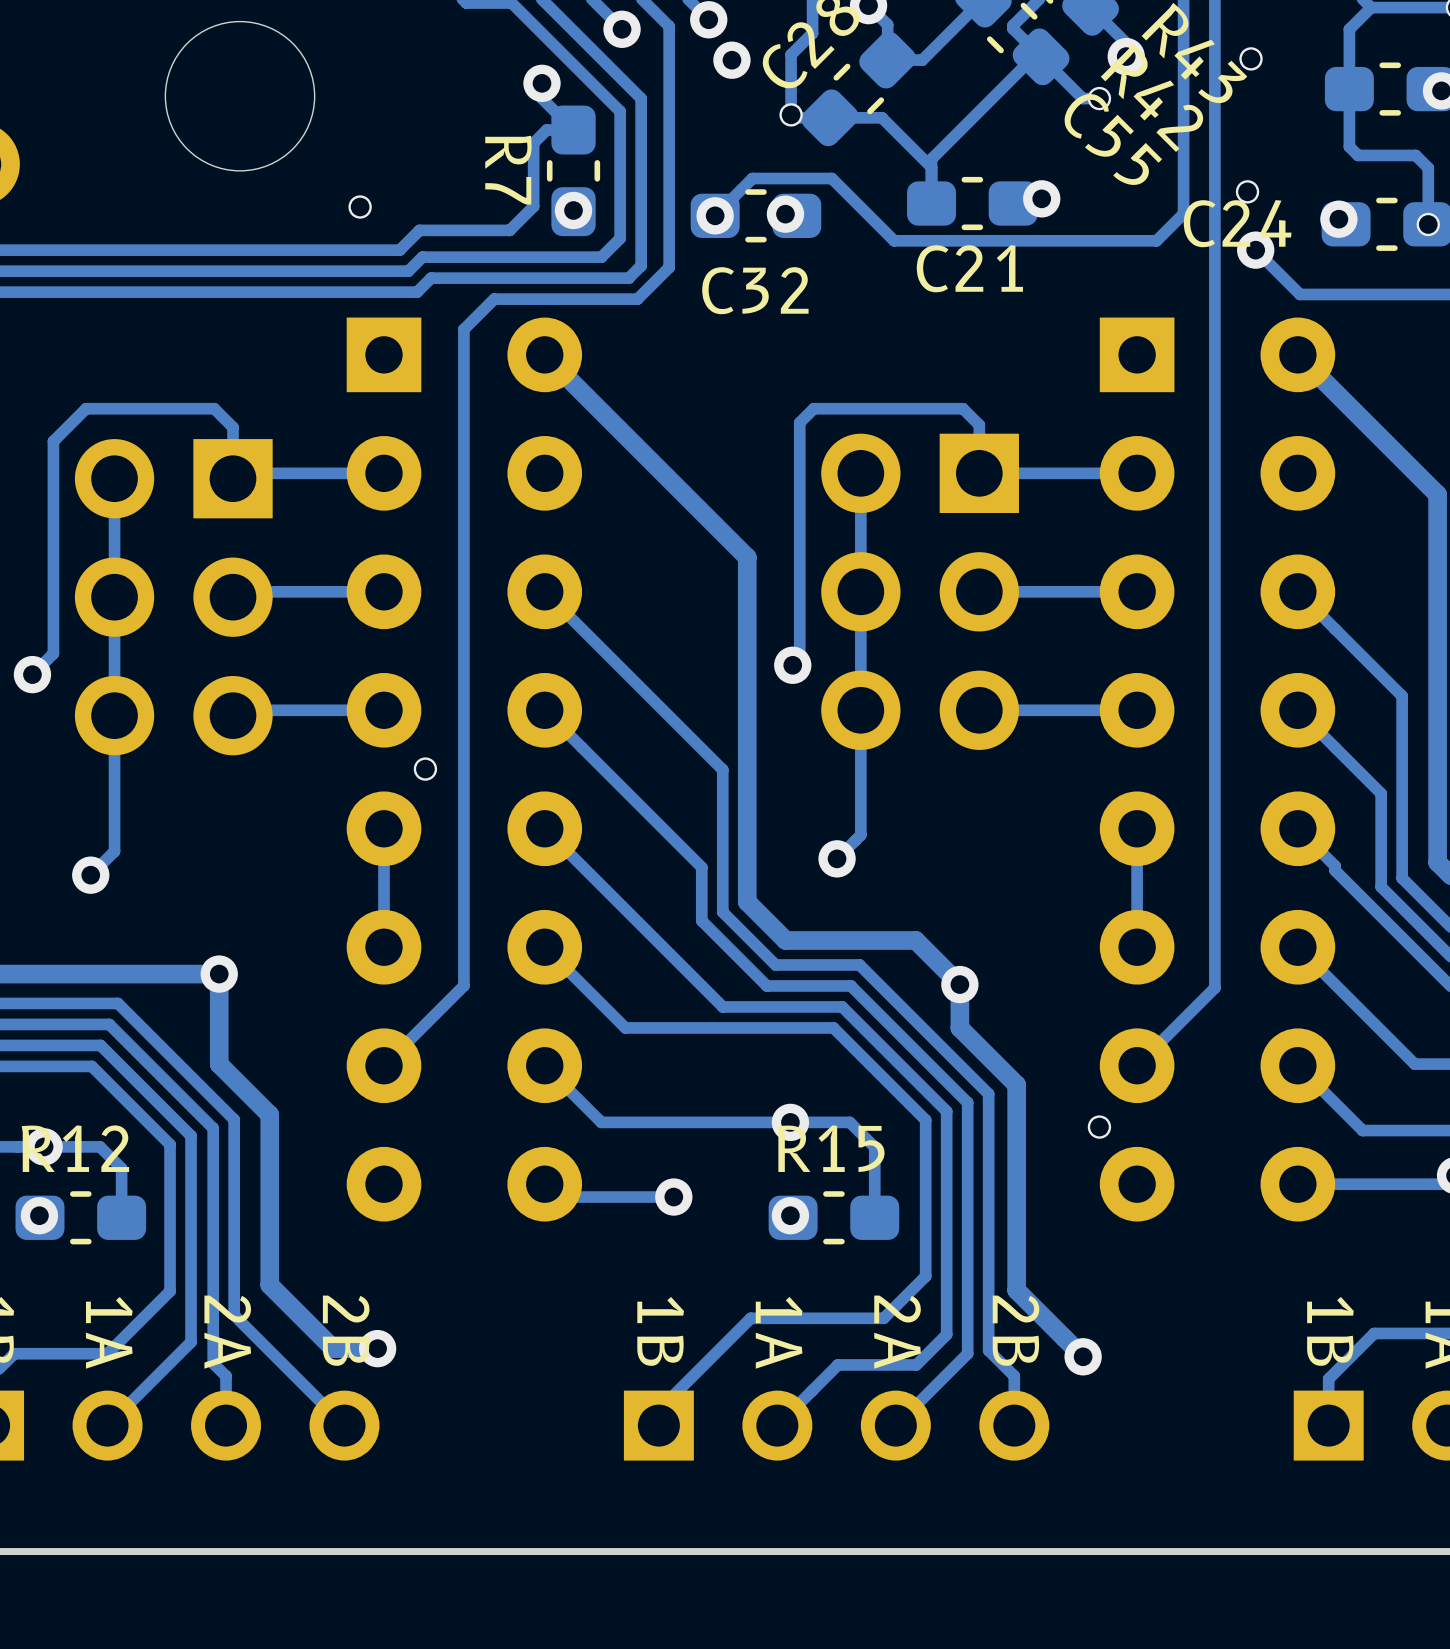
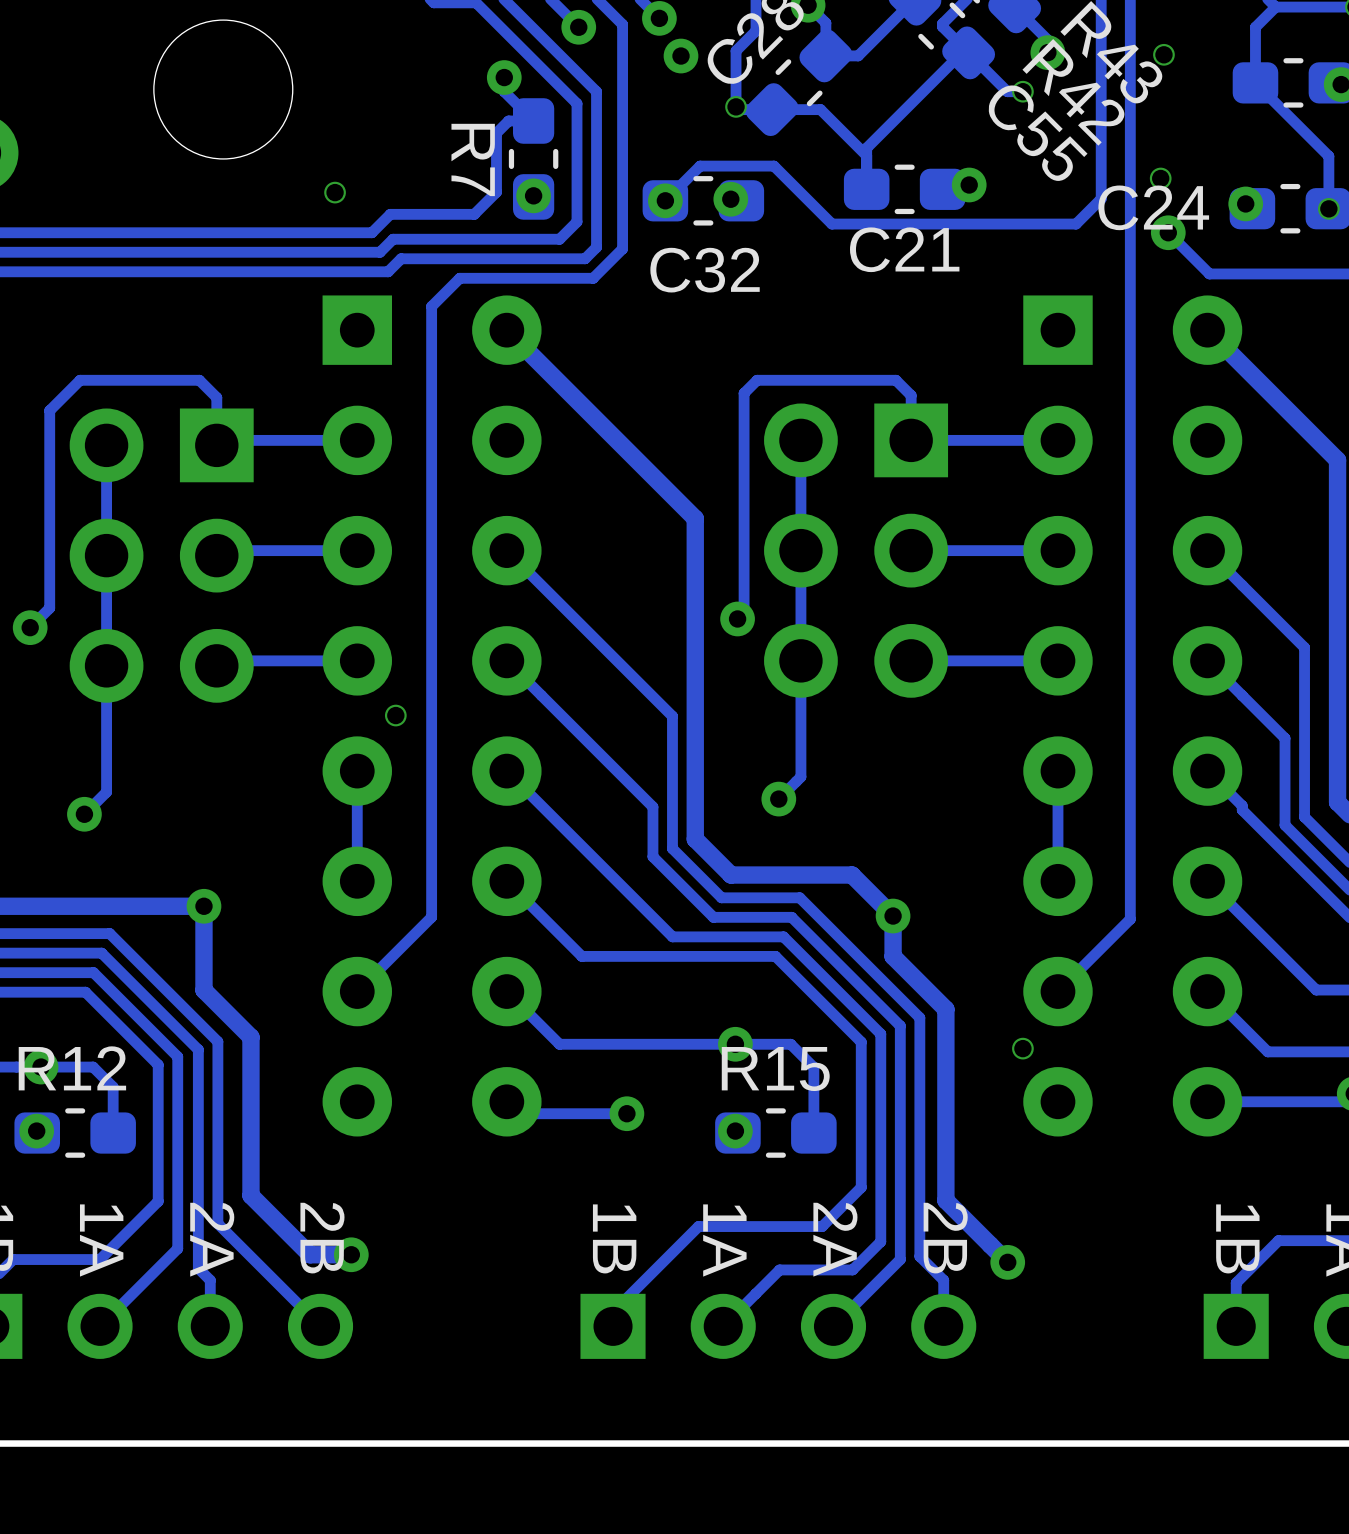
track: (1349, 89) (1349, 146) (1358, 155) (1415, 155) -> (1255, 82) (1317, 144)

